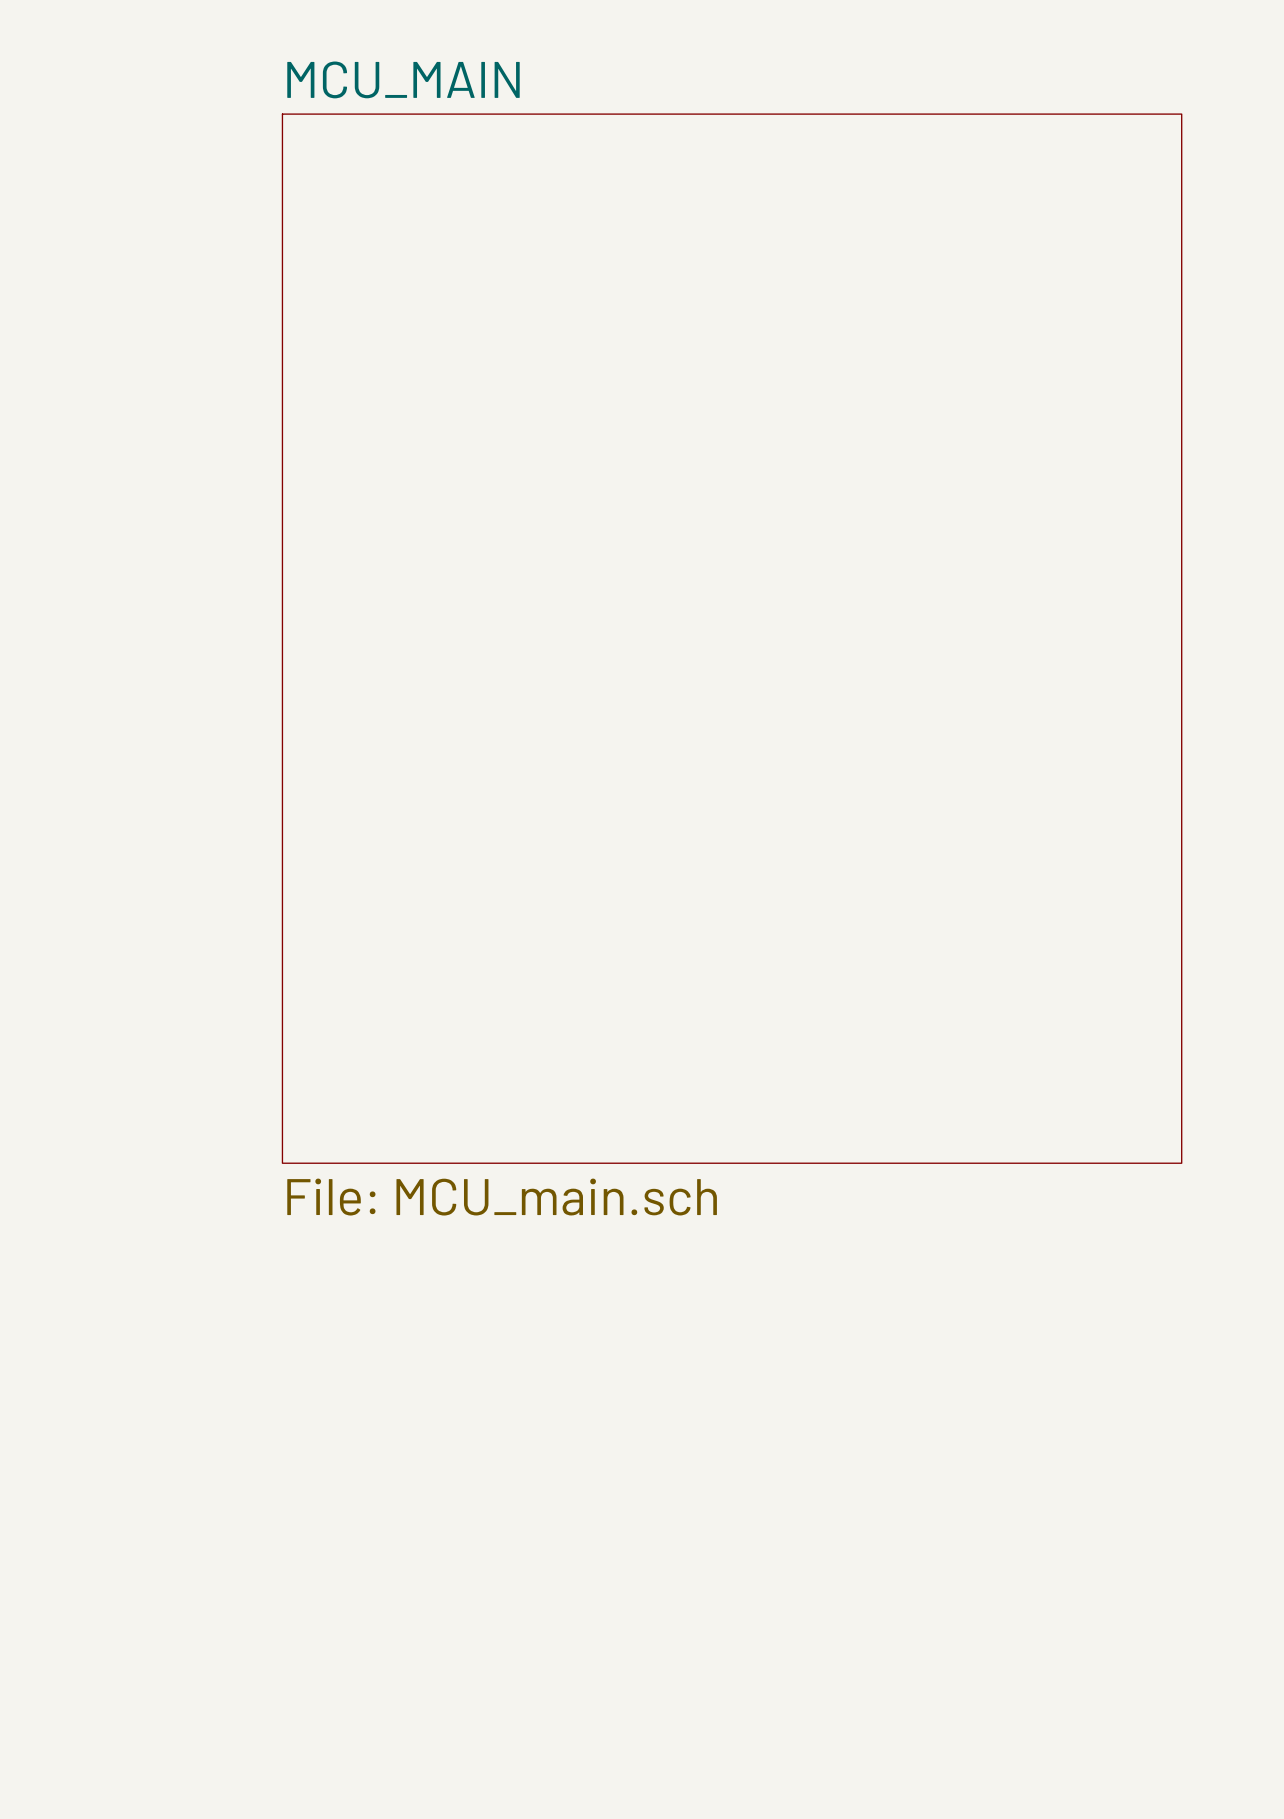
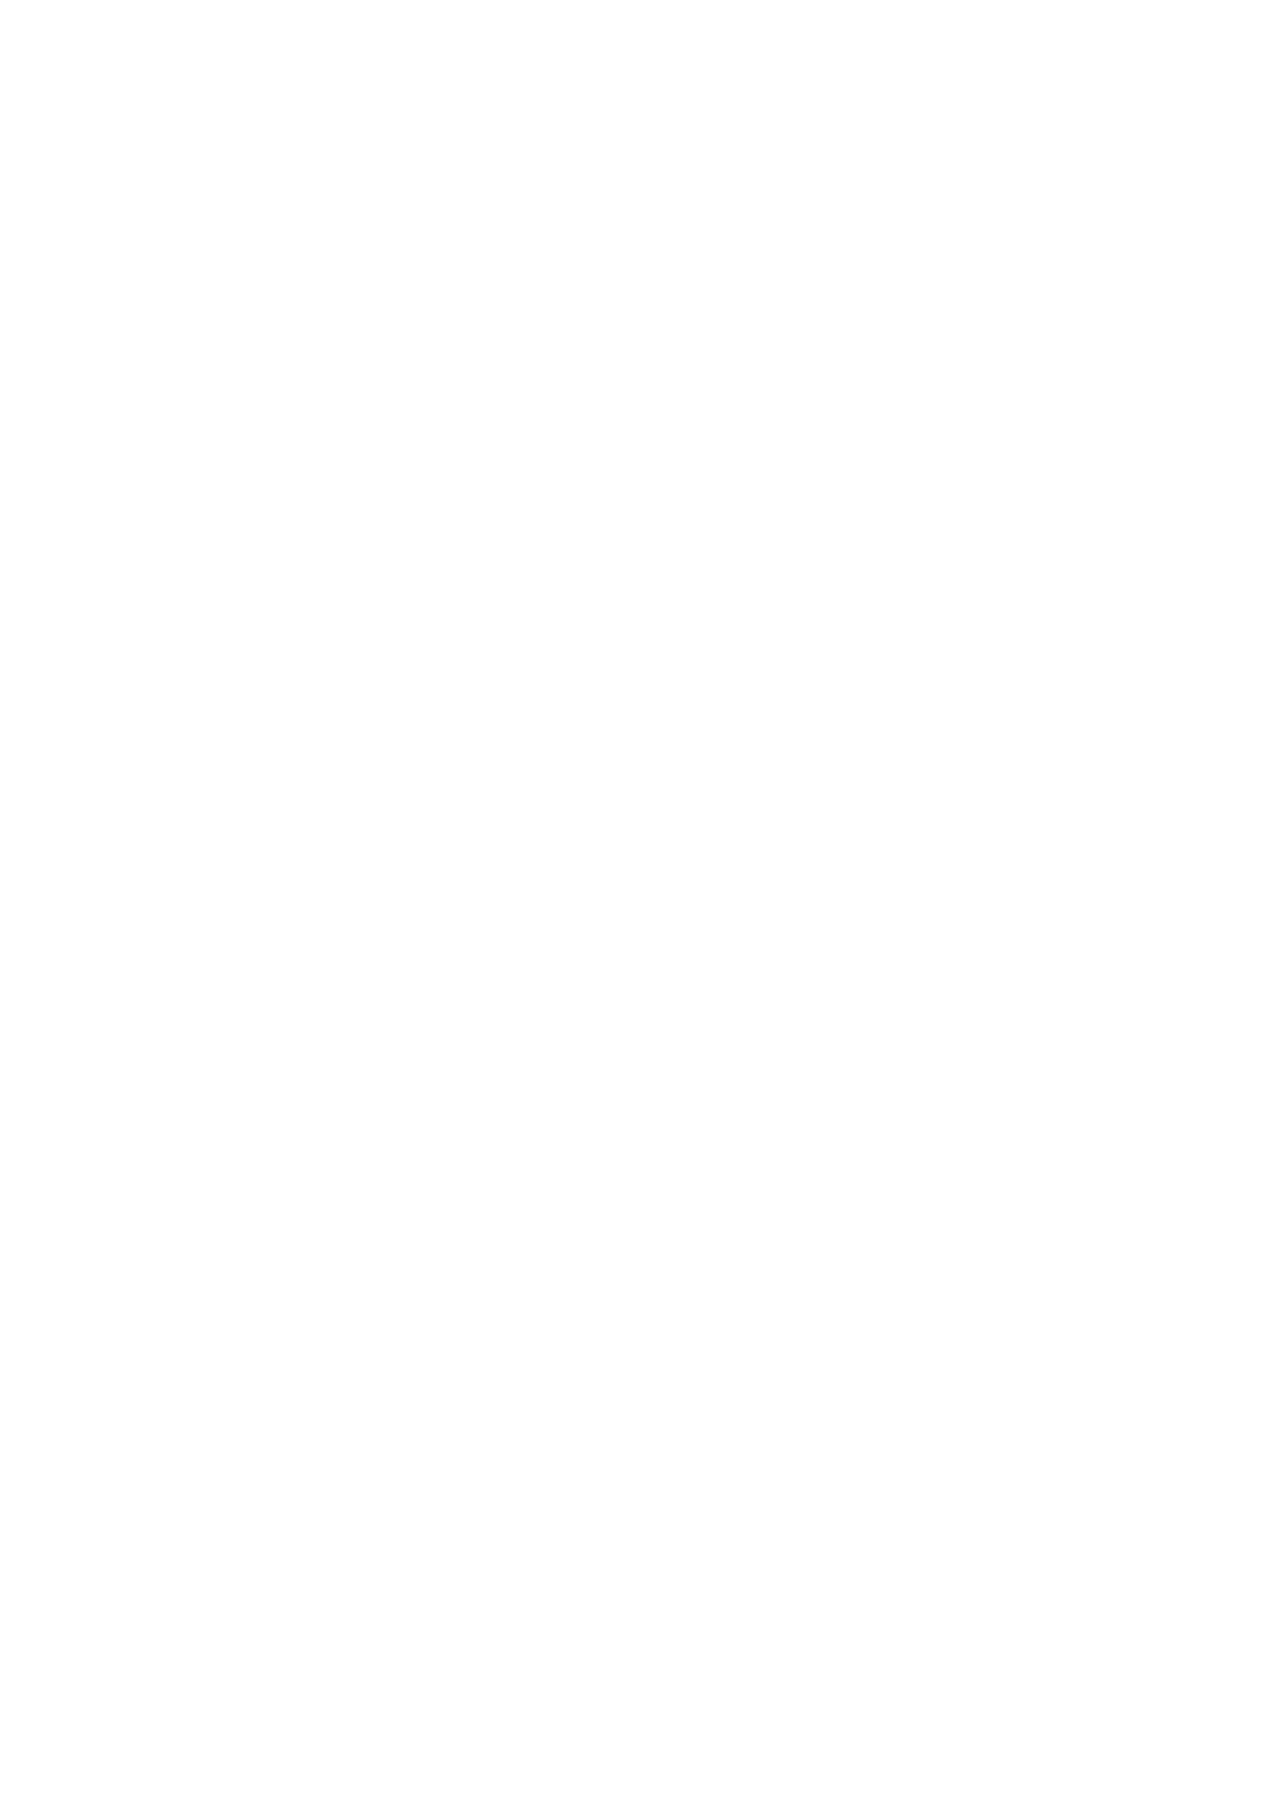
sheet MCU_MAIN: File: MCU_main.sch (732, 638) -> none

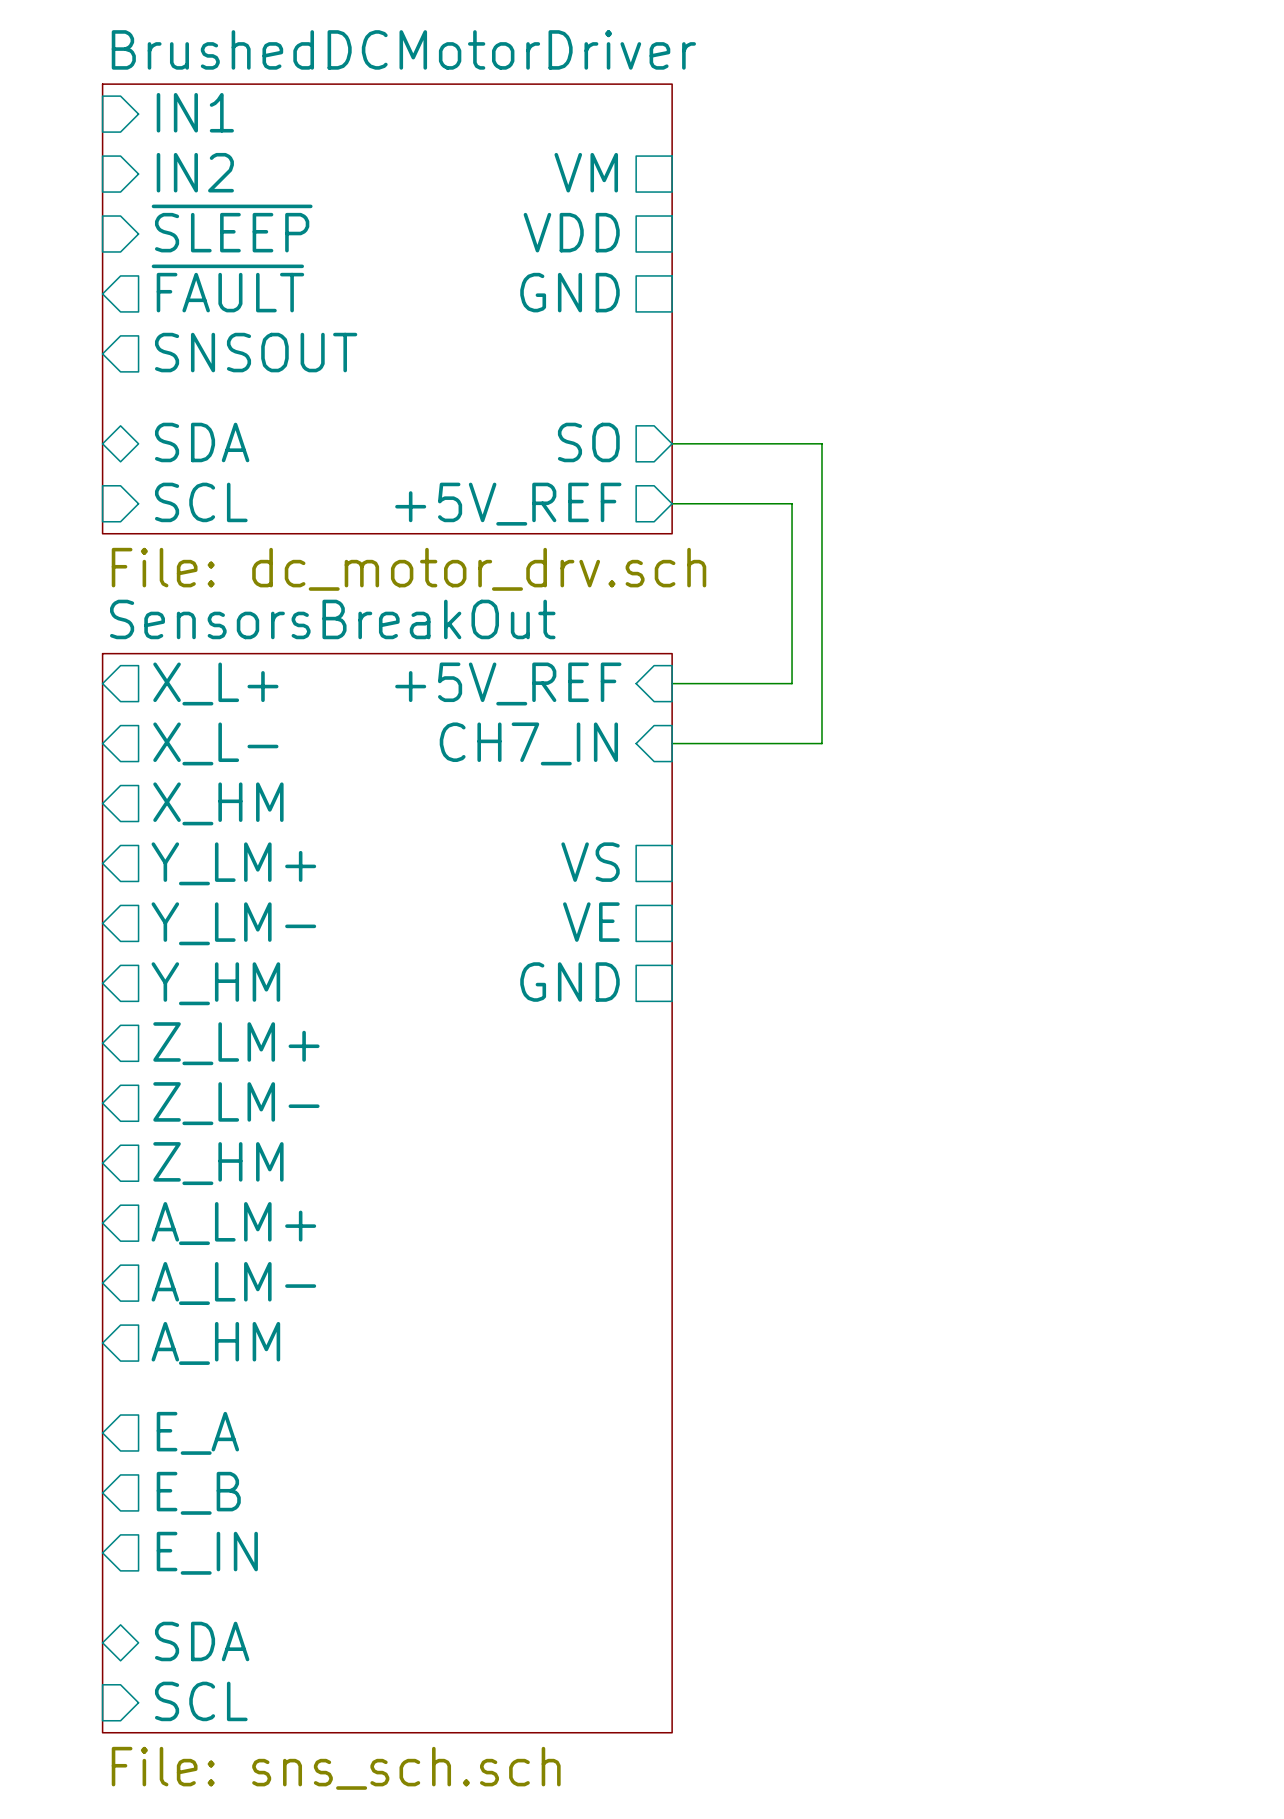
sheet pin: none -> IN1 (195, 112)
sheet pin: none -> IN2 (195, 172)
sheet pin: none -> VM (586, 172)
sheet pin: none -> ~{SLEEP} (232, 228)
sheet pin: none -> VDD (571, 232)
sheet pin: none -> ~{FAULT} (227, 288)
sheet pin: none -> GND (569, 292)
sheet BrushedDCMotorDriver: none -> File: dc_motor_drv.sch (387, 308)
sheet pin: none -> SNSOUT (256, 352)
sheet pin: none -> SDA (202, 442)
sheet pin: none -> SO (588, 442)
wire: none -> (672, 443) (821, 443) (821, 743) (672, 743)
sheet pin: none -> SCL (201, 502)
wire: none -> (672, 503) (792, 503) (792, 683) (672, 683)
sheet pin: none -> +5V_REF (508, 504)
sheet pin: none -> X_L+ (215, 683)
sheet pin: none -> +5V_REF (508, 683)
sheet pin: none -> X_L- (215, 743)
sheet pin: none -> CH7_IN (528, 743)
sheet pin: none -> X_HM (218, 803)
sheet pin: none -> VS (590, 862)
sheet pin: none -> Y_LM+ (233, 863)
sheet pin: none -> VE (591, 922)
sheet pin: none -> Y_LM- (233, 923)
sheet pin: none -> GND (569, 982)
sheet pin: none -> Y_HM (215, 983)
sheet pin: none -> Z_LM+ (236, 1043)
sheet pin: none -> Z_LM- (236, 1103)
sheet pin: none -> Z_HM (218, 1163)
sheet SensorsBreakOut: none -> File: sns_sch.sch (387, 1193)
sheet pin: none -> A_LM+ (233, 1223)
sheet pin: none -> A_LM- (233, 1283)
sheet pin: none -> A_HM (215, 1343)
sheet pin: none -> E_A (197, 1433)
sheet pin: none -> E_B (198, 1493)
sheet pin: none -> E_IN (207, 1553)
sheet pin: none -> SDA (202, 1641)
sheet pin: none -> SCL (201, 1701)

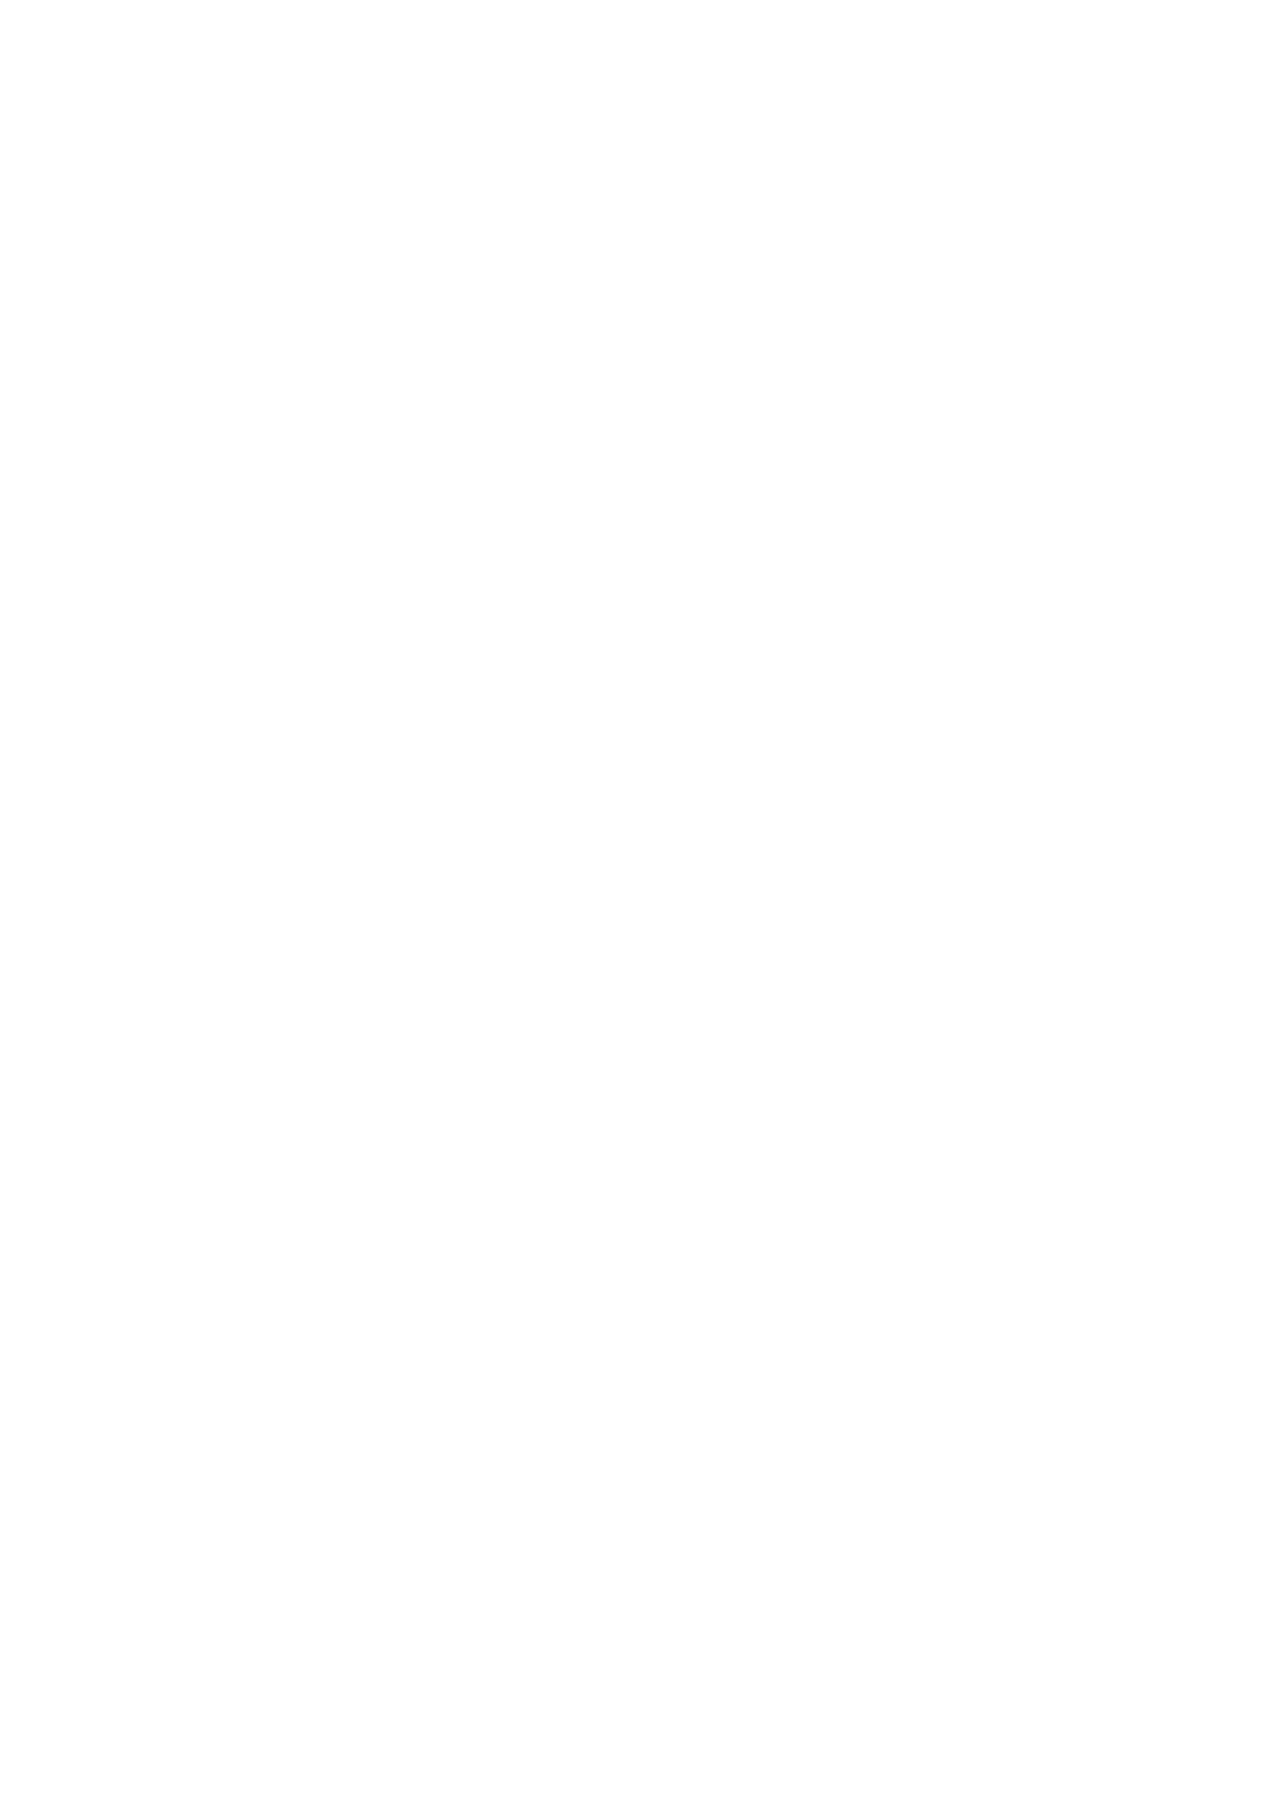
sheet pin: IN1 (195, 112) -> none
sheet pin: IN2 (195, 172) -> none
sheet pin: VM (586, 172) -> none
sheet pin: ~{SLEEP} (232, 228) -> none
sheet pin: VDD (571, 232) -> none
sheet pin: ~{FAULT} (227, 288) -> none
sheet pin: GND (569, 292) -> none
sheet BrushedDCMotorDriver: File: dc_motor_drv.sch (387, 308) -> none
sheet pin: SNSOUT (256, 352) -> none
sheet pin: SDA (202, 442) -> none
sheet pin: SO (588, 442) -> none
wire: (672, 443) (821, 443) (821, 743) (672, 743) -> none
sheet pin: SCL (201, 502) -> none
wire: (672, 503) (792, 503) (792, 683) (672, 683) -> none
sheet pin: +5V_REF (508, 504) -> none
sheet pin: X_L+ (215, 683) -> none
sheet pin: +5V_REF (508, 683) -> none
sheet pin: X_L- (215, 743) -> none
sheet pin: CH7_IN (528, 743) -> none
sheet pin: X_HM (218, 803) -> none
sheet pin: VS (590, 862) -> none
sheet pin: Y_LM+ (233, 863) -> none
sheet pin: VE (591, 922) -> none
sheet pin: Y_LM- (233, 923) -> none
sheet pin: GND (569, 982) -> none
sheet pin: Y_HM (215, 983) -> none
sheet pin: Z_LM+ (236, 1043) -> none
sheet pin: Z_LM- (236, 1103) -> none
sheet pin: Z_HM (218, 1163) -> none
sheet SensorsBreakOut: File: sns_sch.sch (387, 1193) -> none
sheet pin: A_LM+ (233, 1223) -> none
sheet pin: A_LM- (233, 1283) -> none
sheet pin: A_HM (215, 1343) -> none
sheet pin: E_A (197, 1433) -> none
sheet pin: E_B (198, 1493) -> none
sheet pin: E_IN (207, 1553) -> none
sheet pin: SDA (202, 1641) -> none
sheet pin: SCL (201, 1701) -> none

